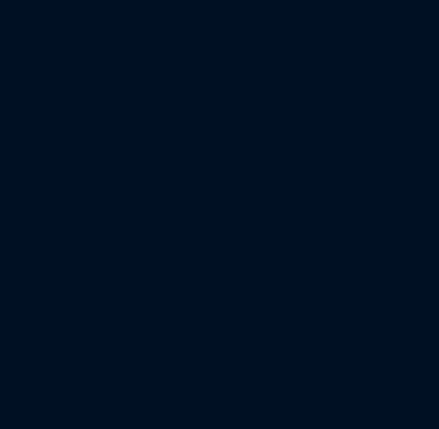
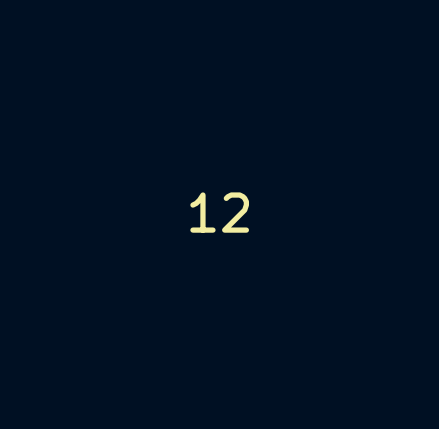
drawing: none -> [190, 192, 250, 233]

